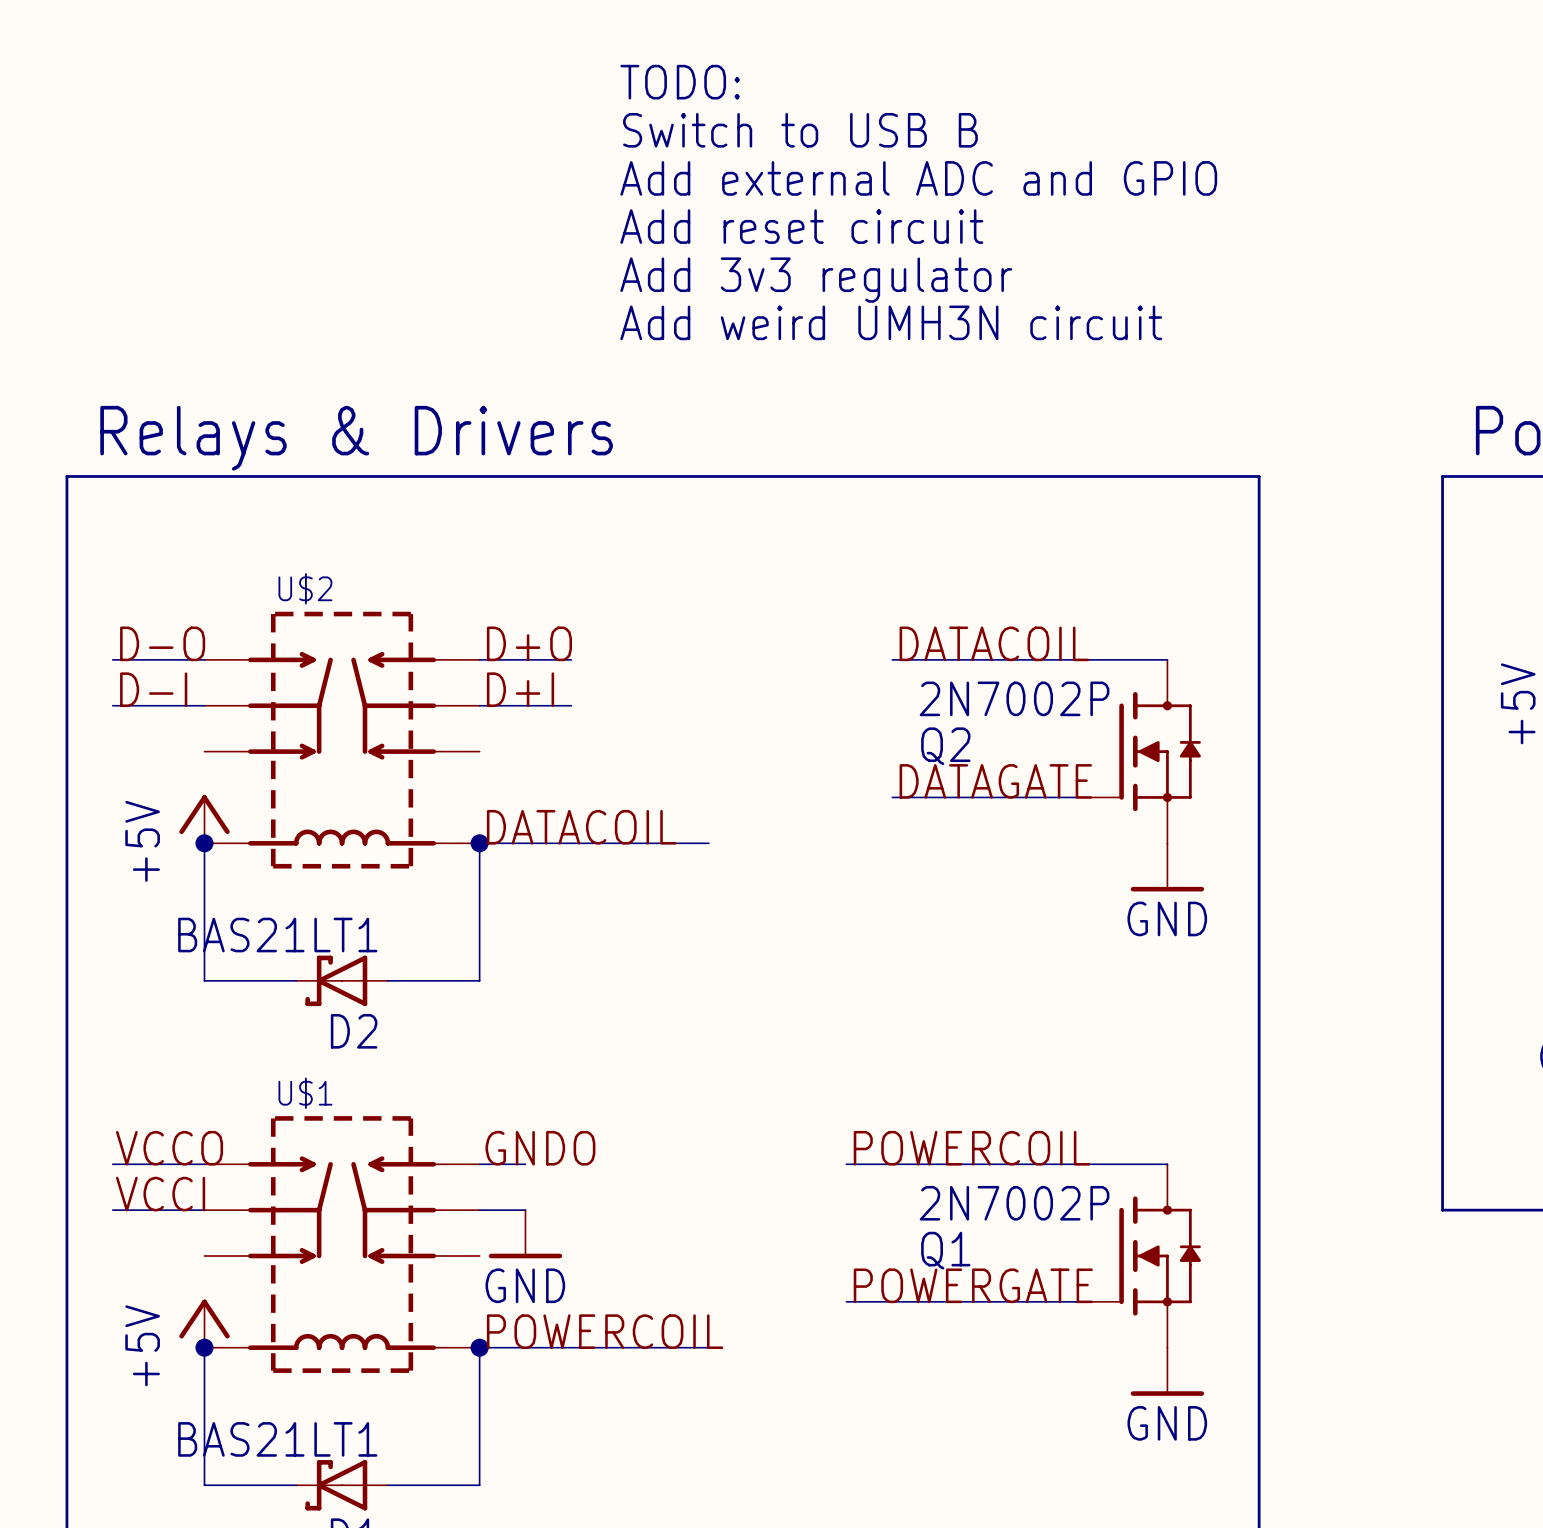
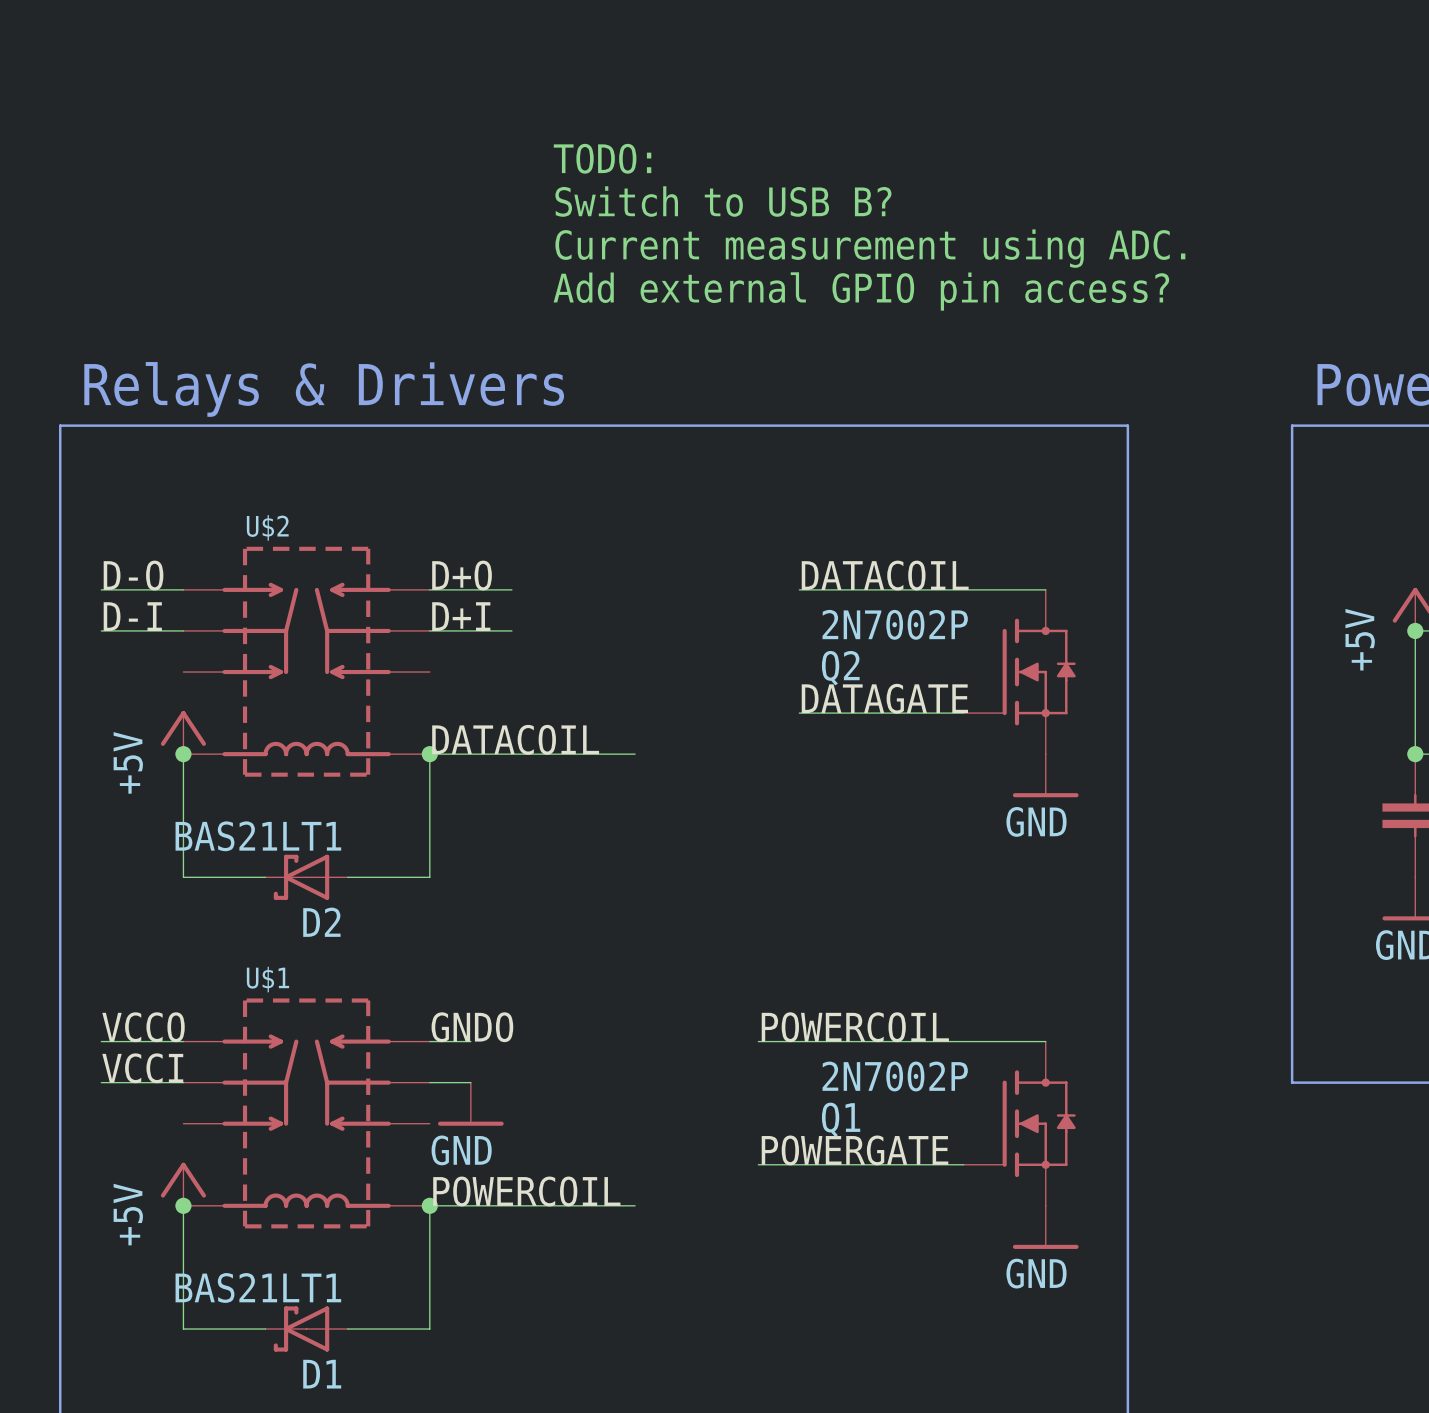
text: TODO: (680, 82) -> none
text: Switch to USB B (800, 130) -> none
text: Add external ADC and GPIO (918, 178) -> TODO: (602, 158)
text: Add reset circuit (801, 226) -> Switch to USB B? (723, 201)
text: Add 3v3 regulator (816, 280) -> Current measurement using ADC. (870, 248)
text: Add weird UMH3N circuit (891, 322) -> Add external GPIO pin access? (861, 291)

